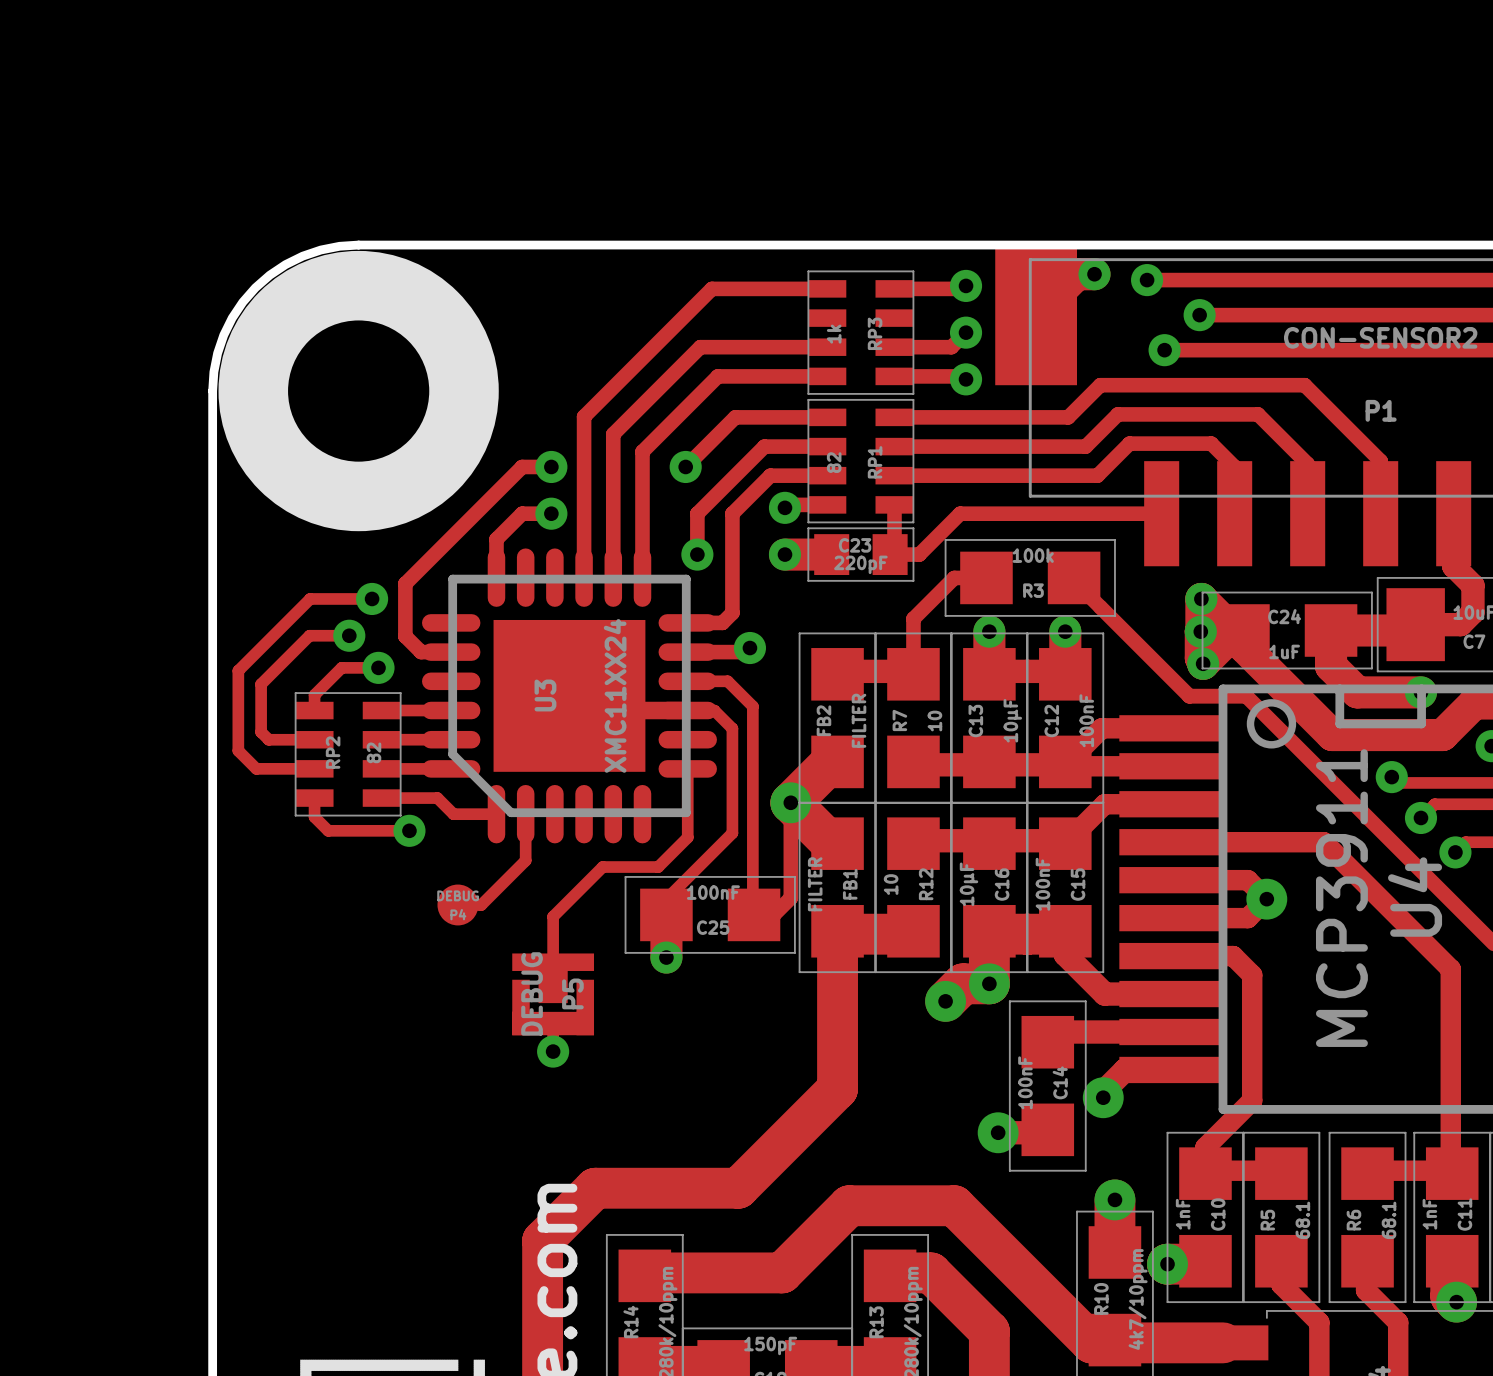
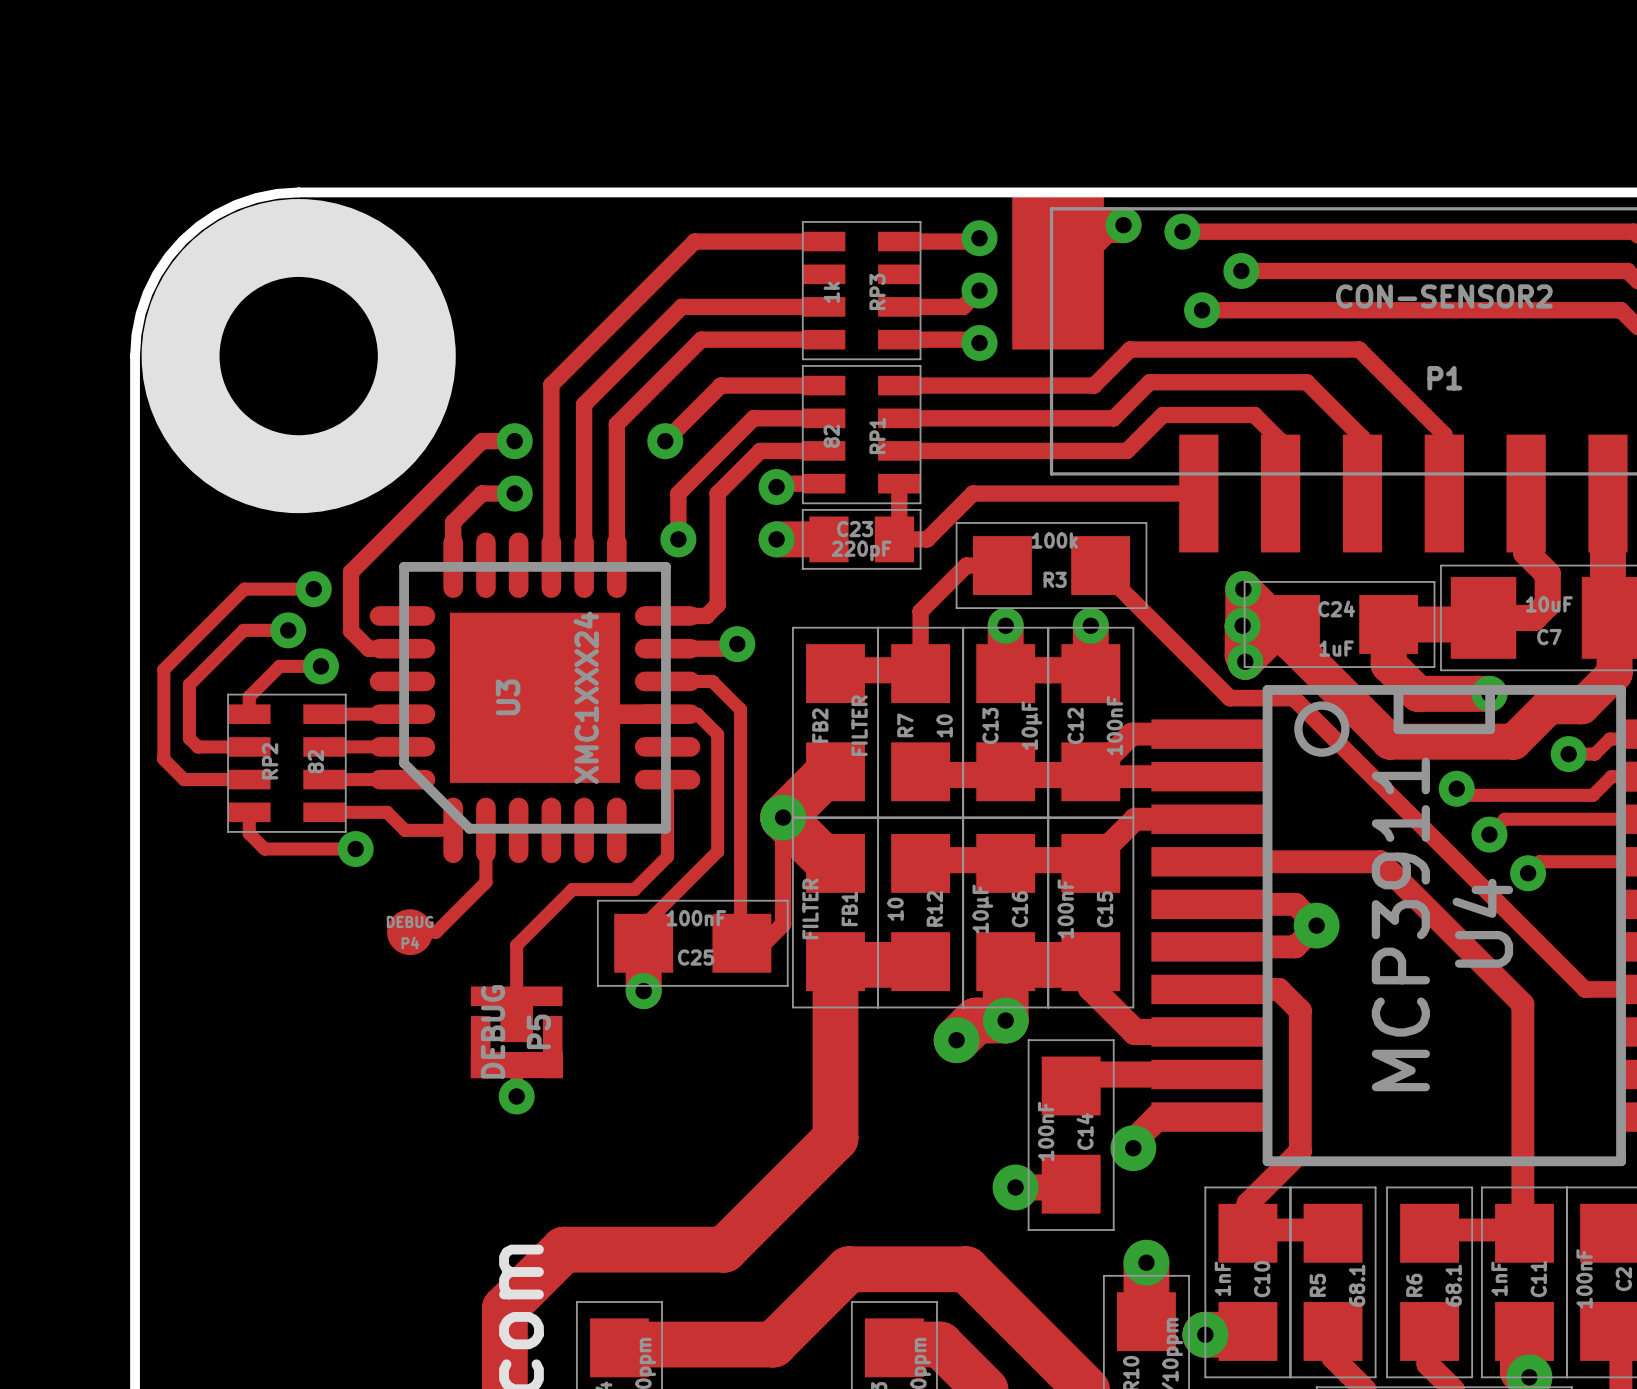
U3 value: XMC11XX24 (615, 695) -> XMC1XXX24 (586, 697)

